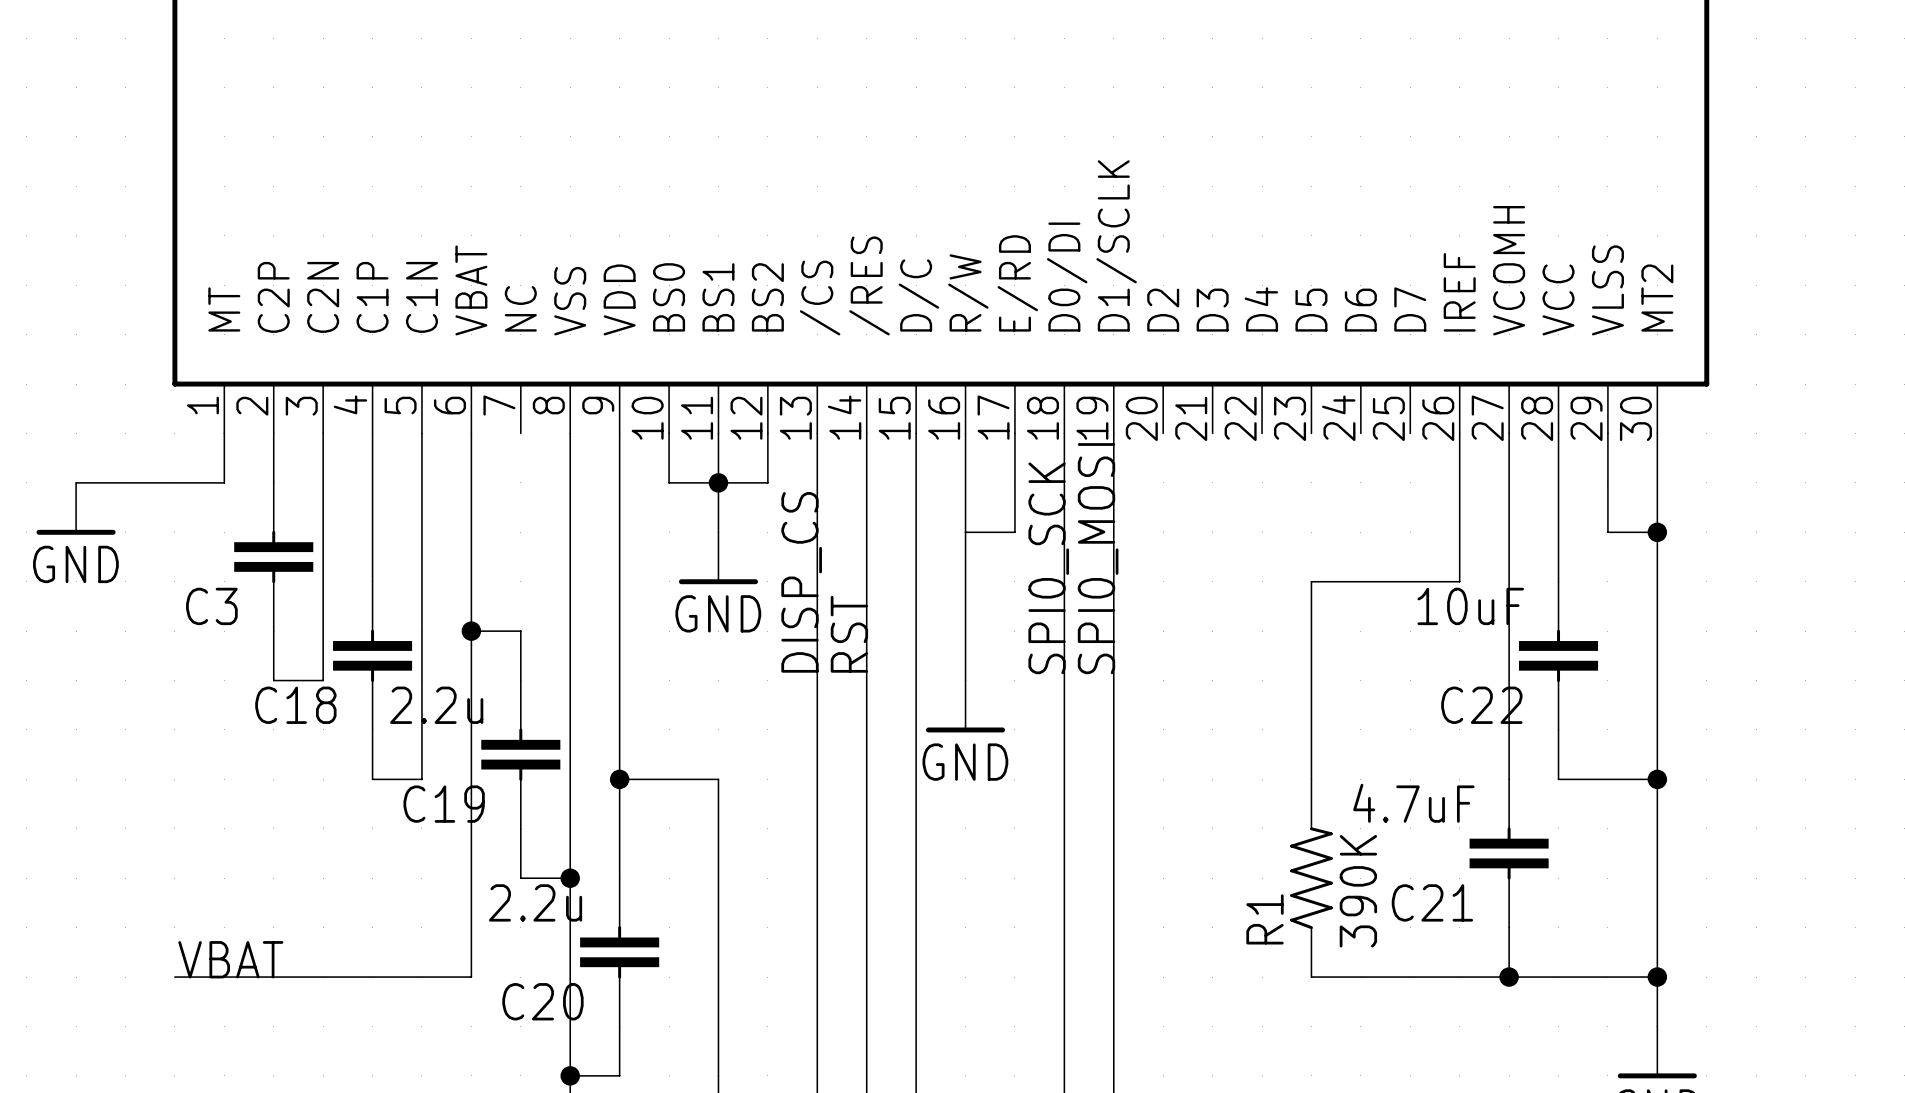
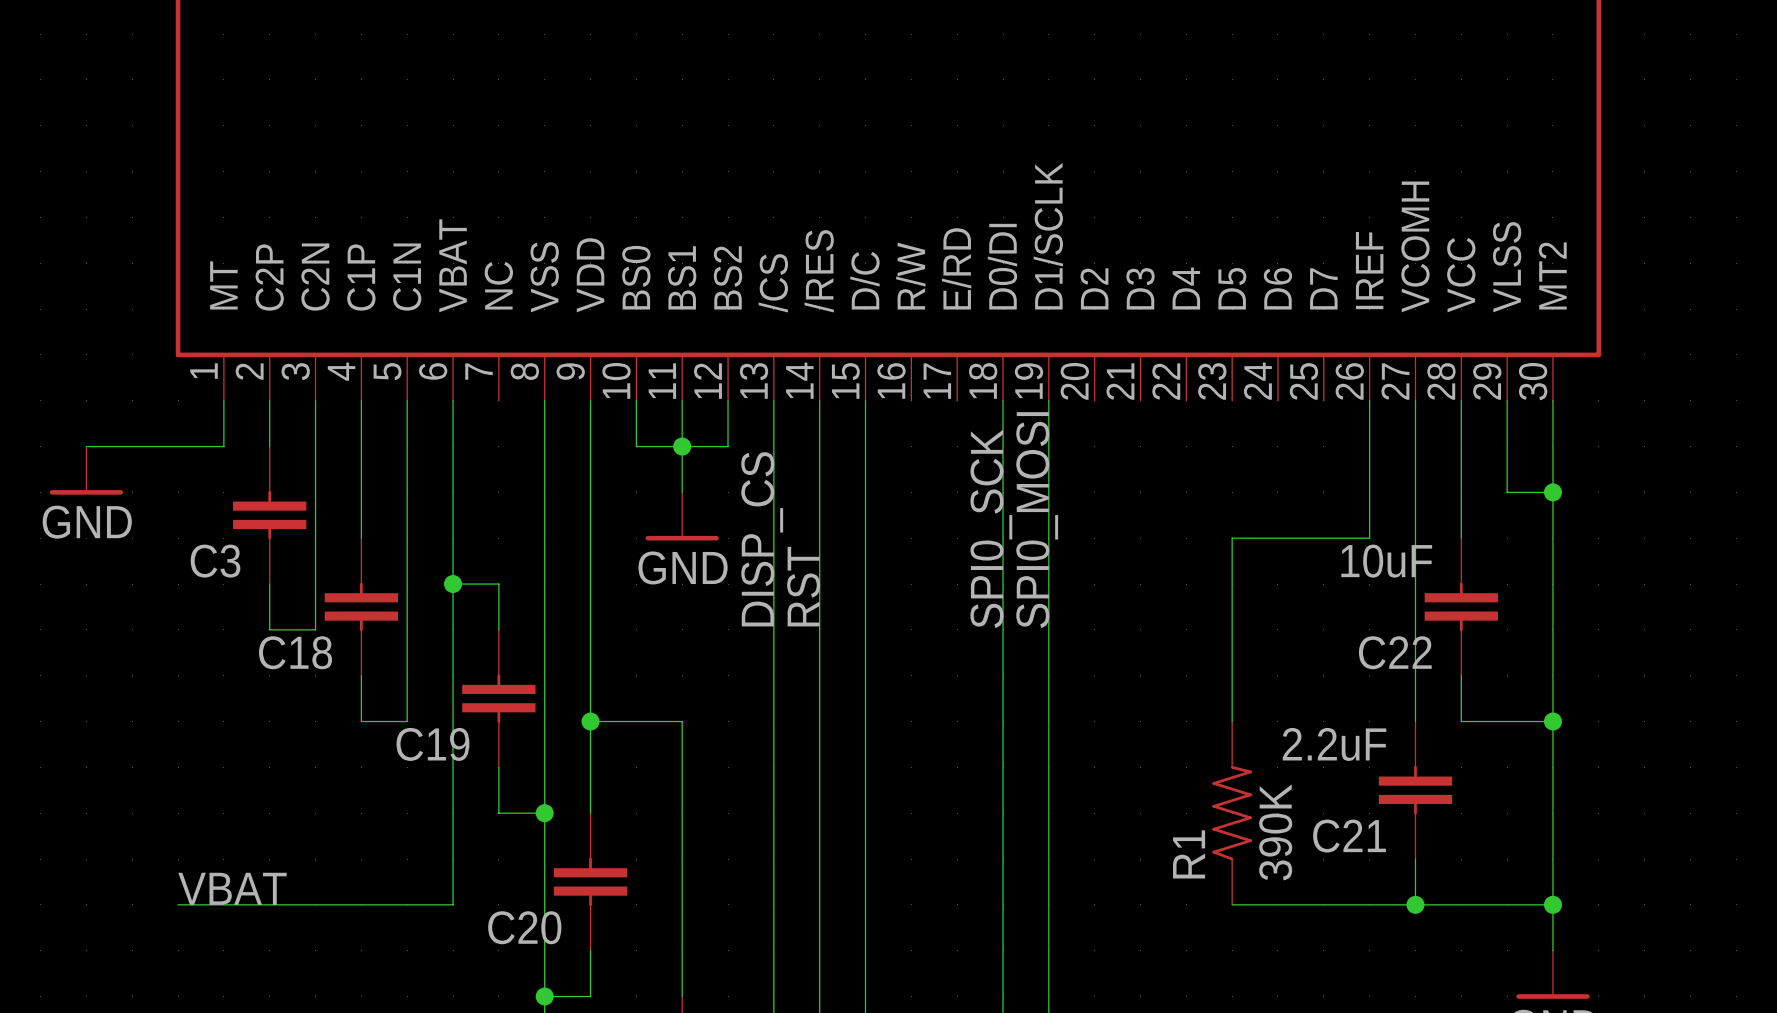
wire: (965, 433) (965, 680) -> none
wire: (1014, 433) (1014, 532) (965, 532) -> none
C19 value: 2.2u (436, 705) -> none
power symbol: GND (965, 706) -> none
C21 value: 4.7uF (1413, 803) -> 2.2uF (1334, 744)
C20 value: 2.2u (535, 902) -> none

